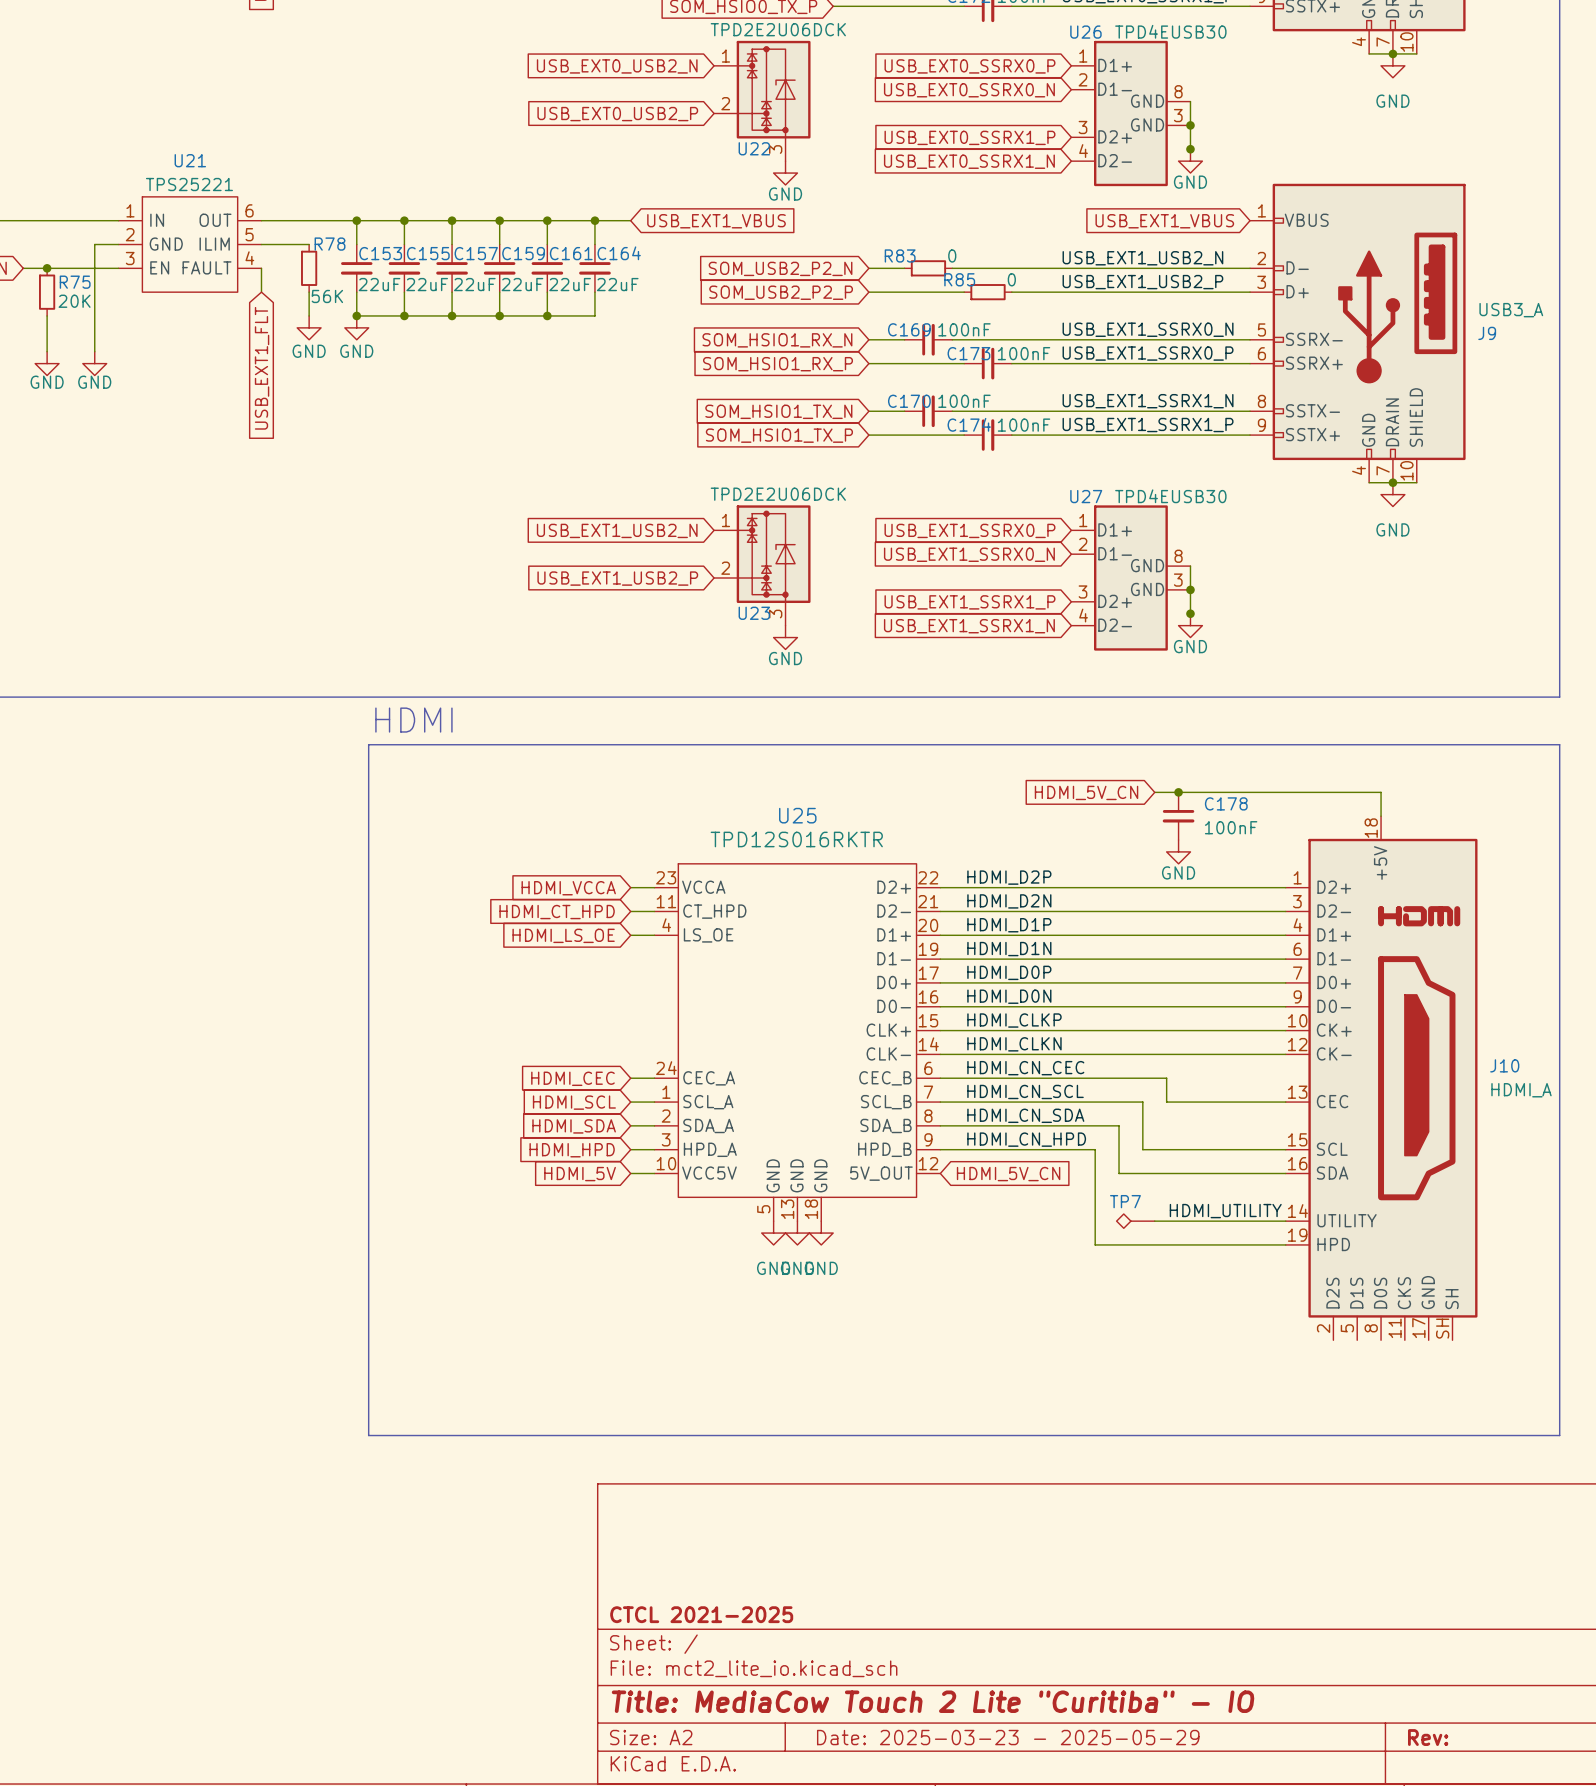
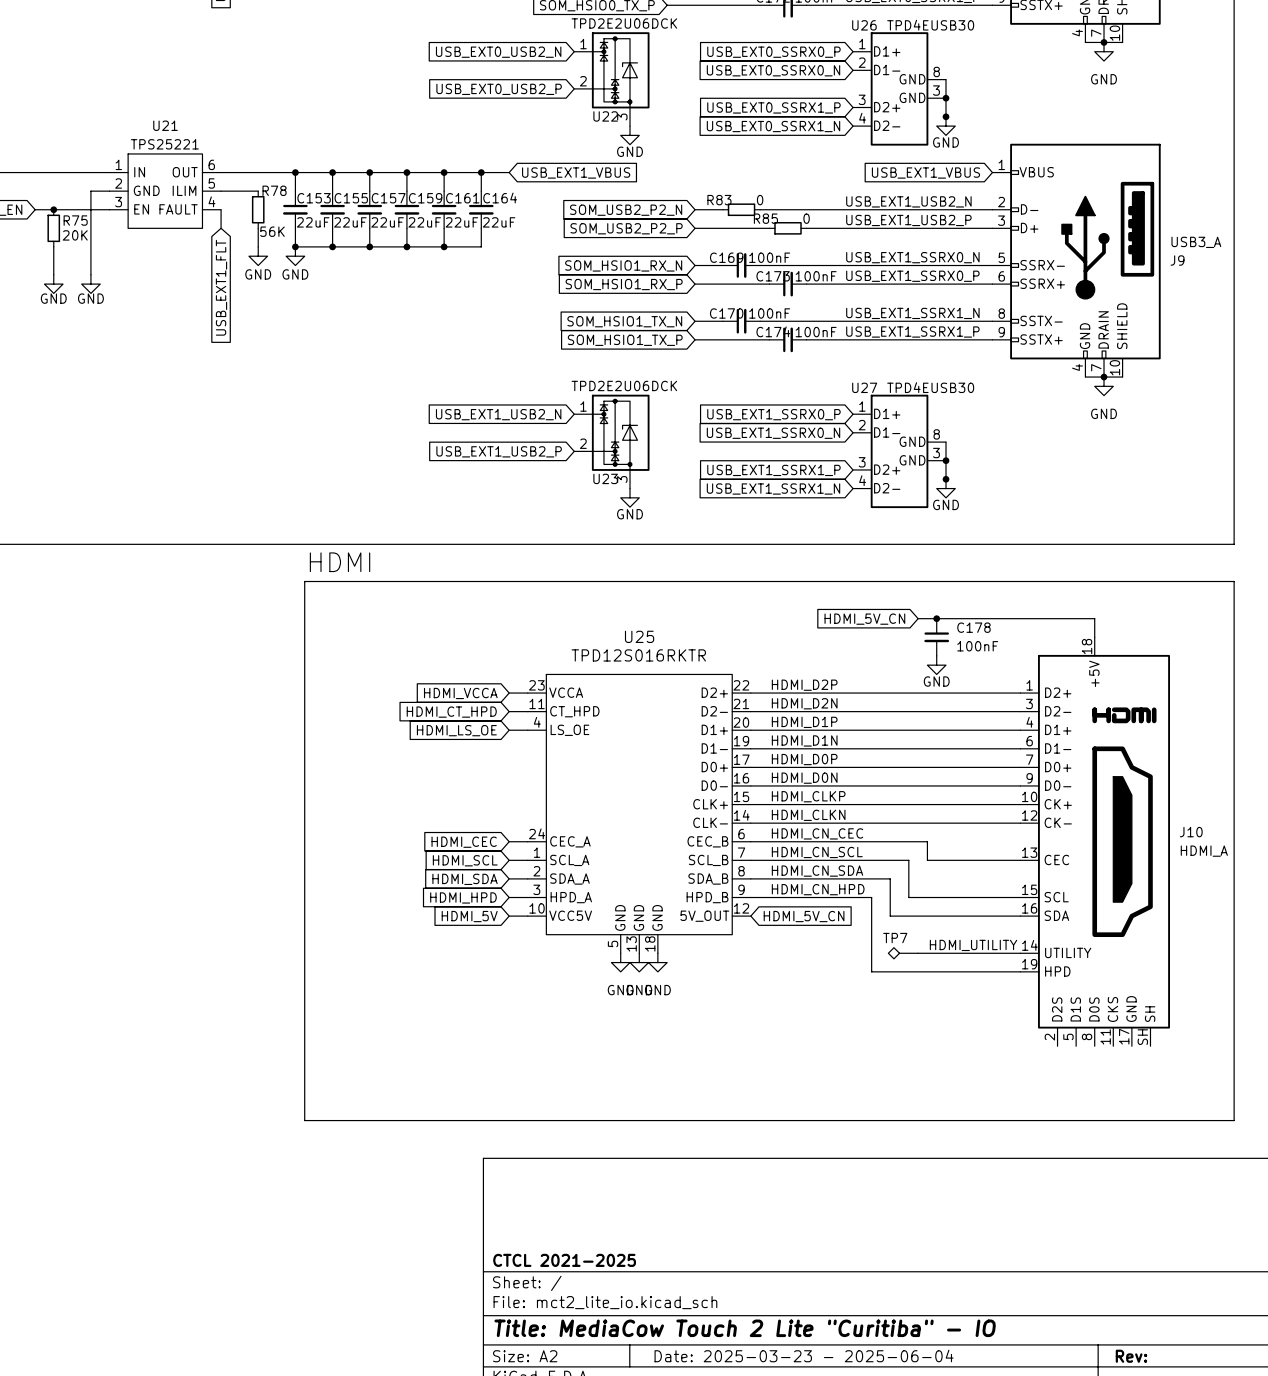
title block: Date: 2025-03-23 - 2025-05-29 (1008, 1737) -> Date: 2025-03-23 - 2025-06-04 (804, 1355)

